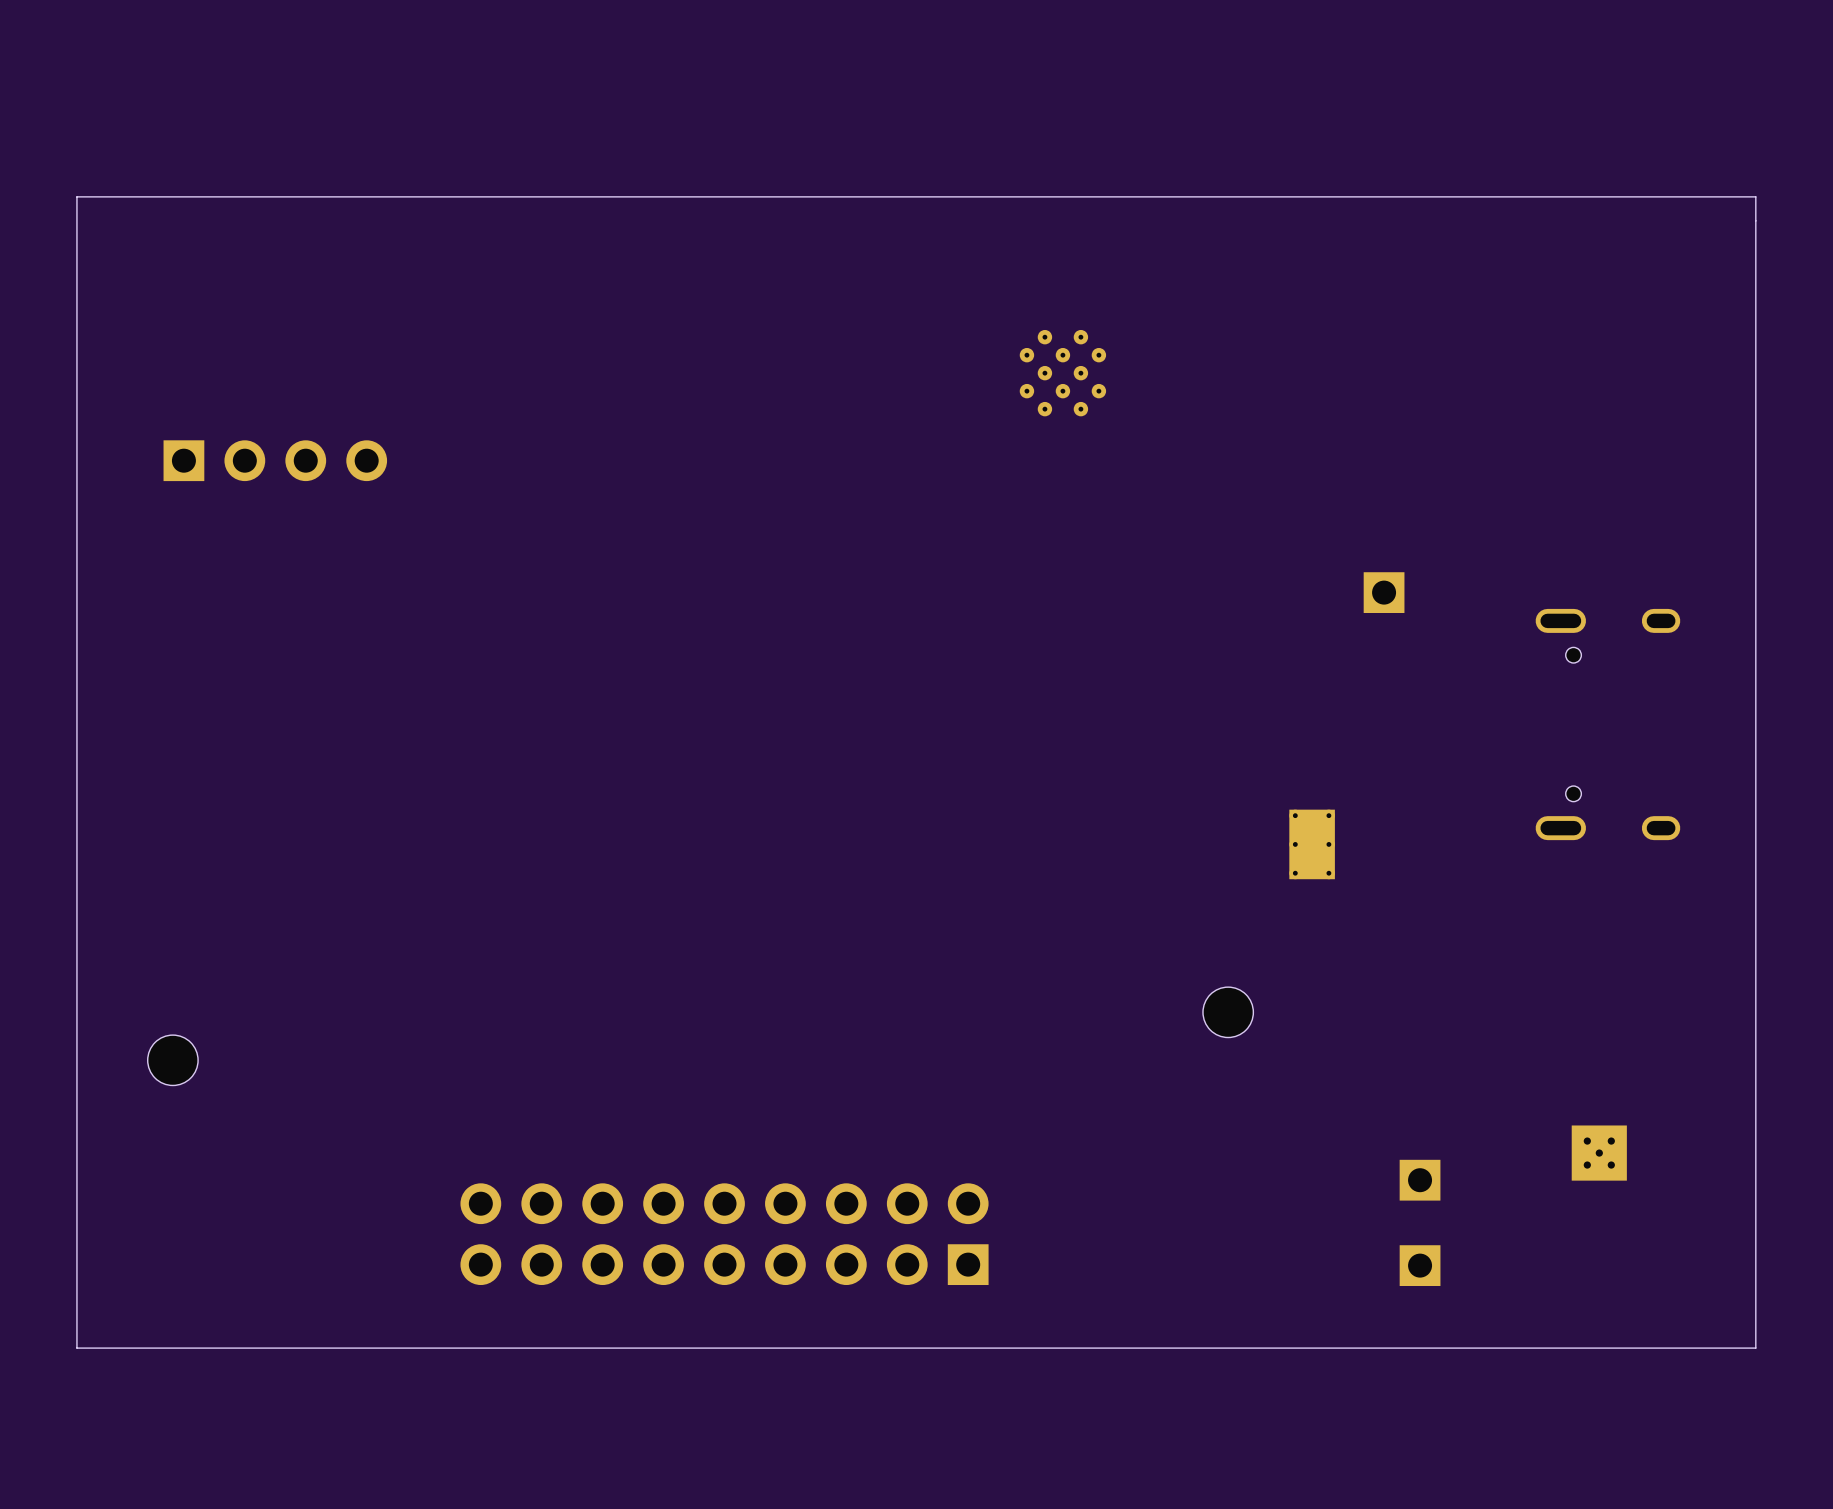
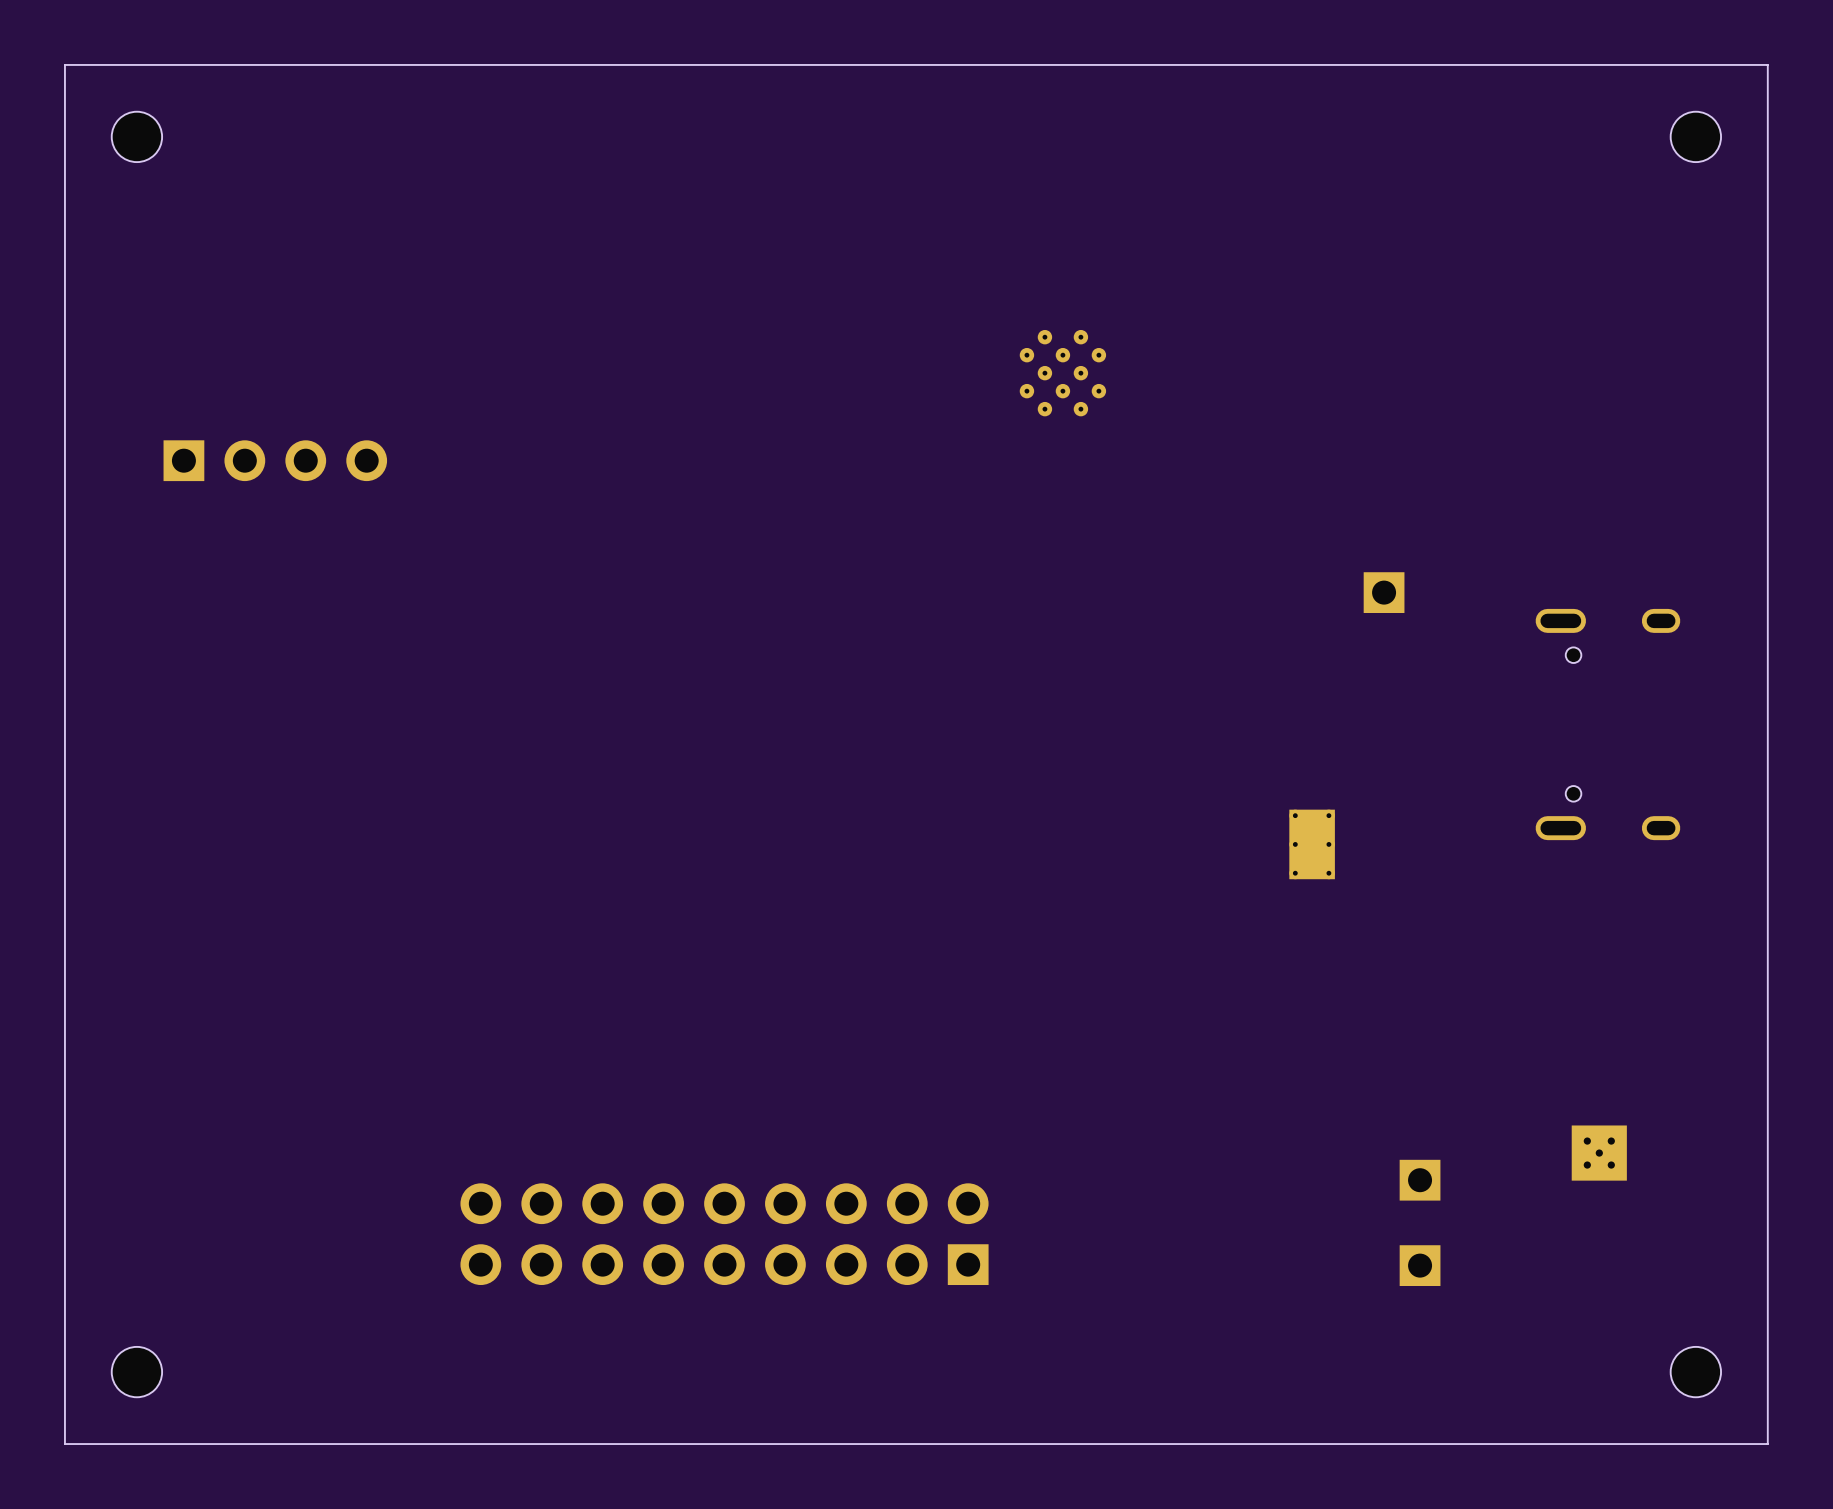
part: none -> (136, 136)
part: none -> (1695, 136)
board edge: (1755, 196) (1755, 1348) (76, 1348) (76, 196) (1755, 196) -> (1767, 64) (1767, 1444) (64, 1444) (64, 64) (1767, 64)
part: (1228, 1012) -> none
part position: (172, 1060) -> (136, 1372)
part: none -> (1695, 1372)

